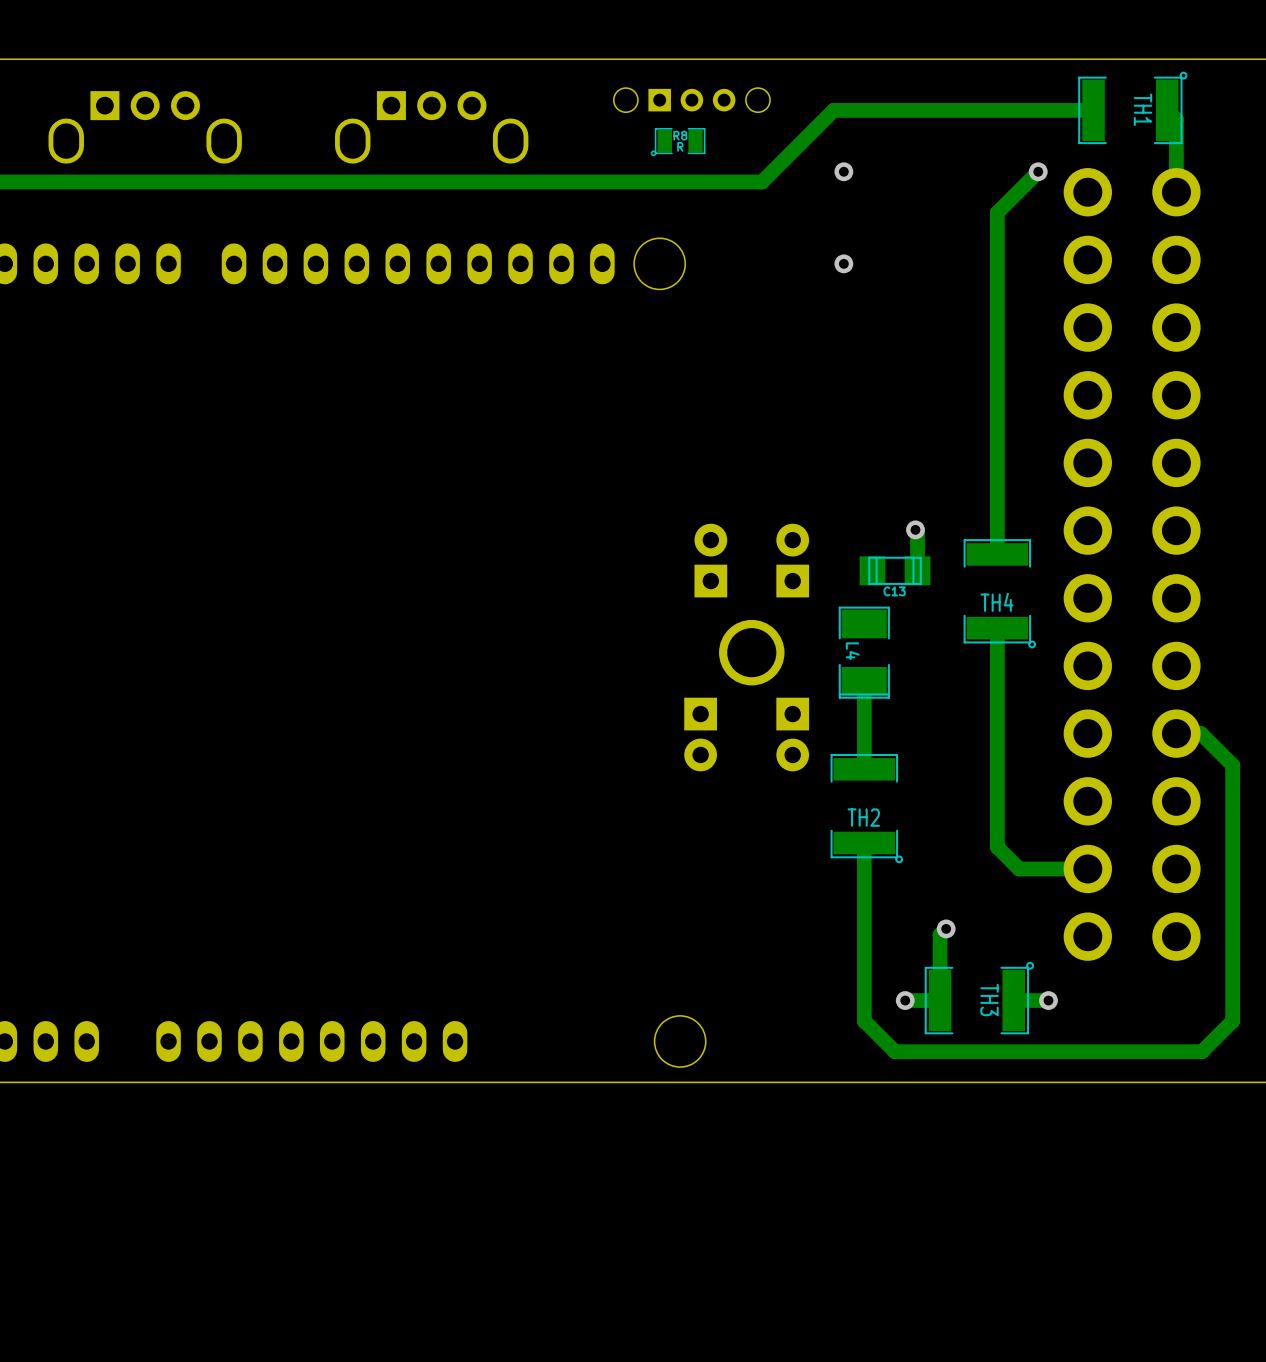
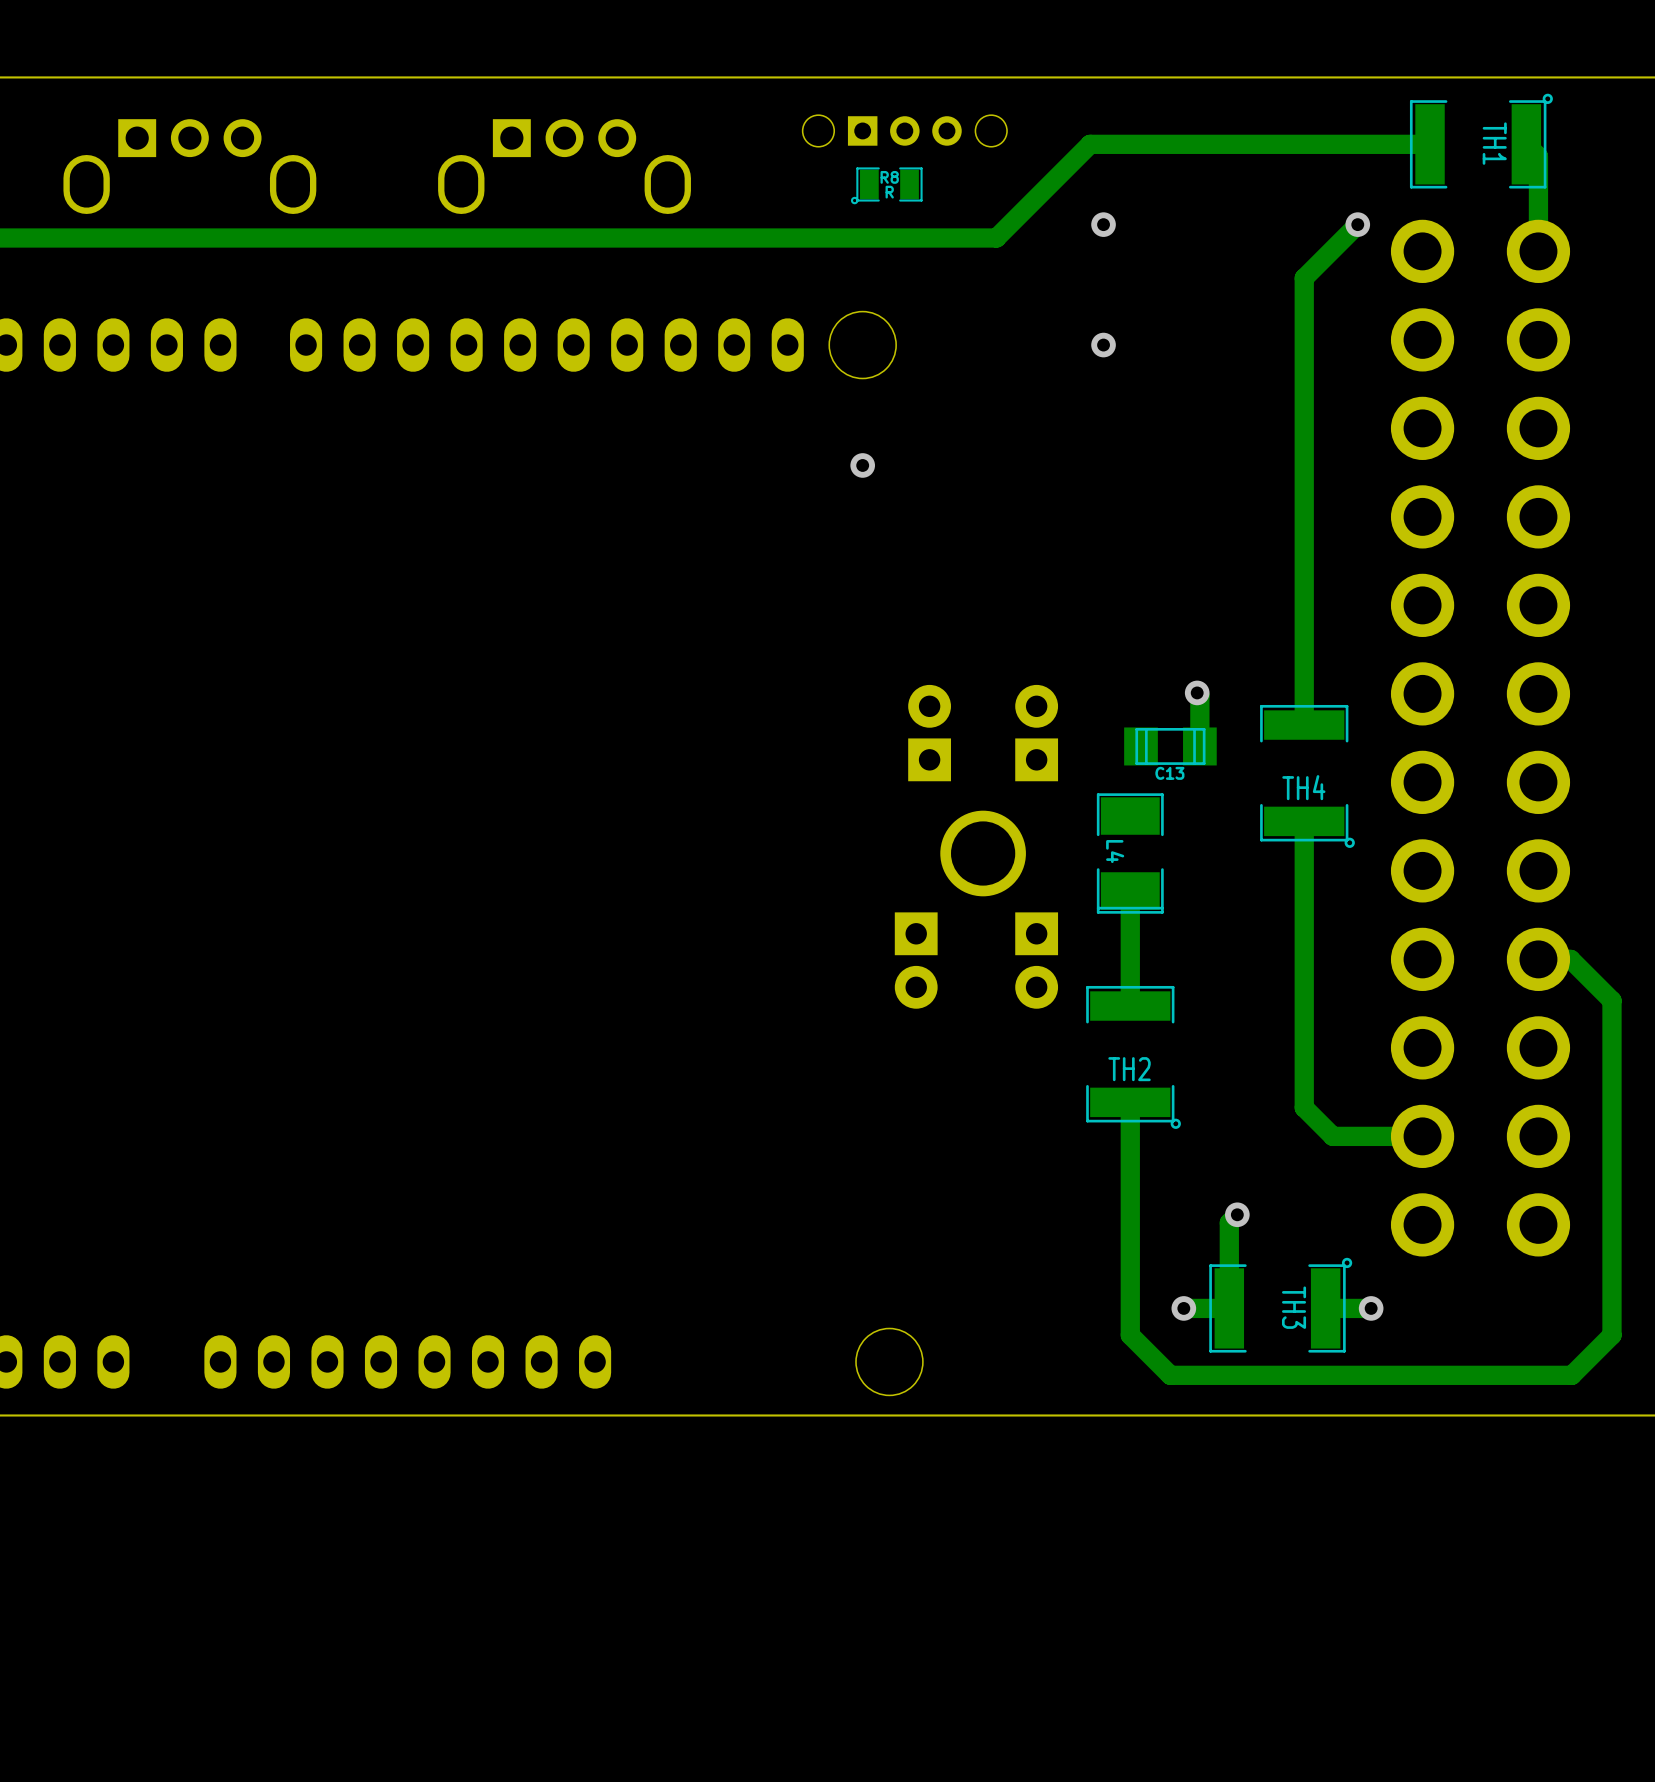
via: none -> (862, 465)

